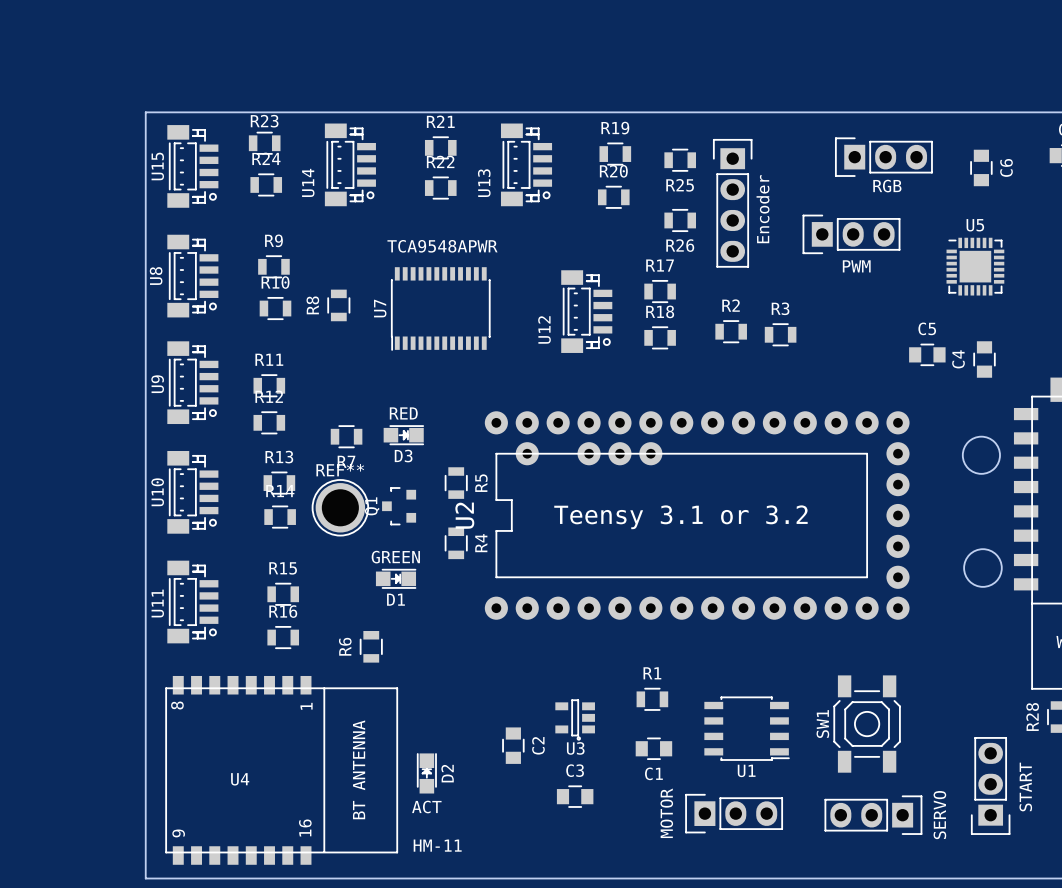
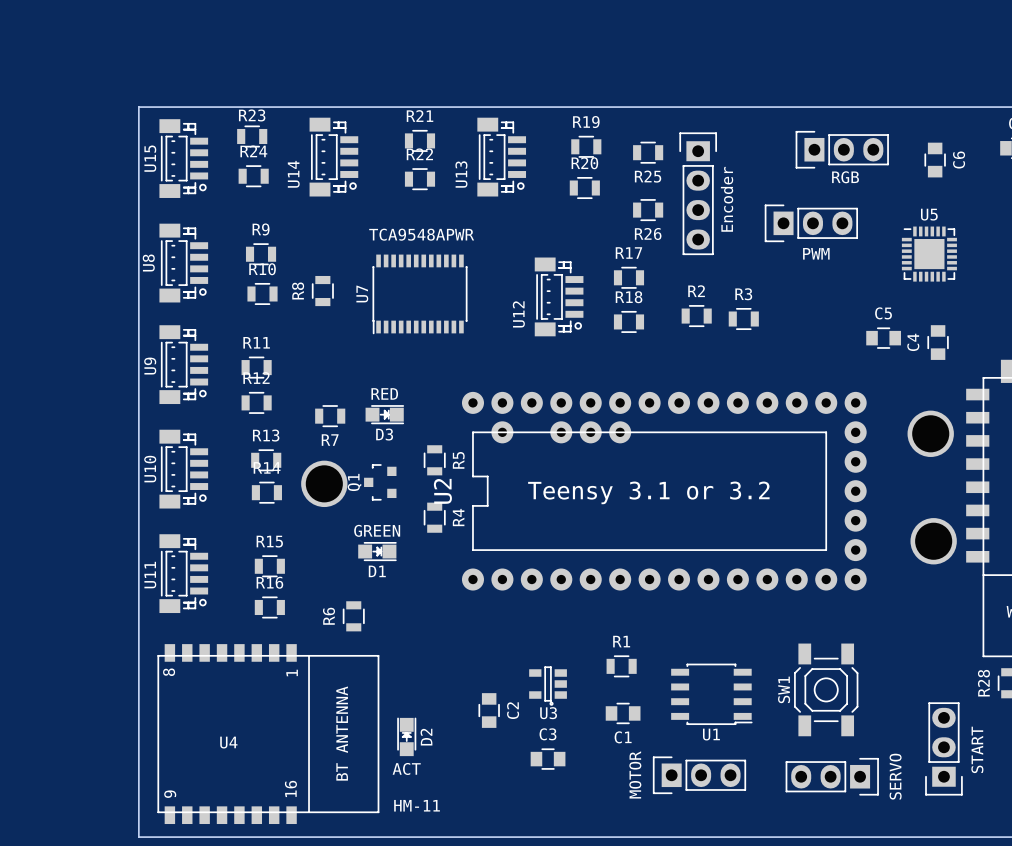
round board edge: [961, 435, 1001, 475] -> none
part: none -> (930, 433)
REF**: (340, 507) -> none
part: none -> (324, 483)
round board edge: [963, 548, 1003, 588] -> none
part: none -> (933, 541)

